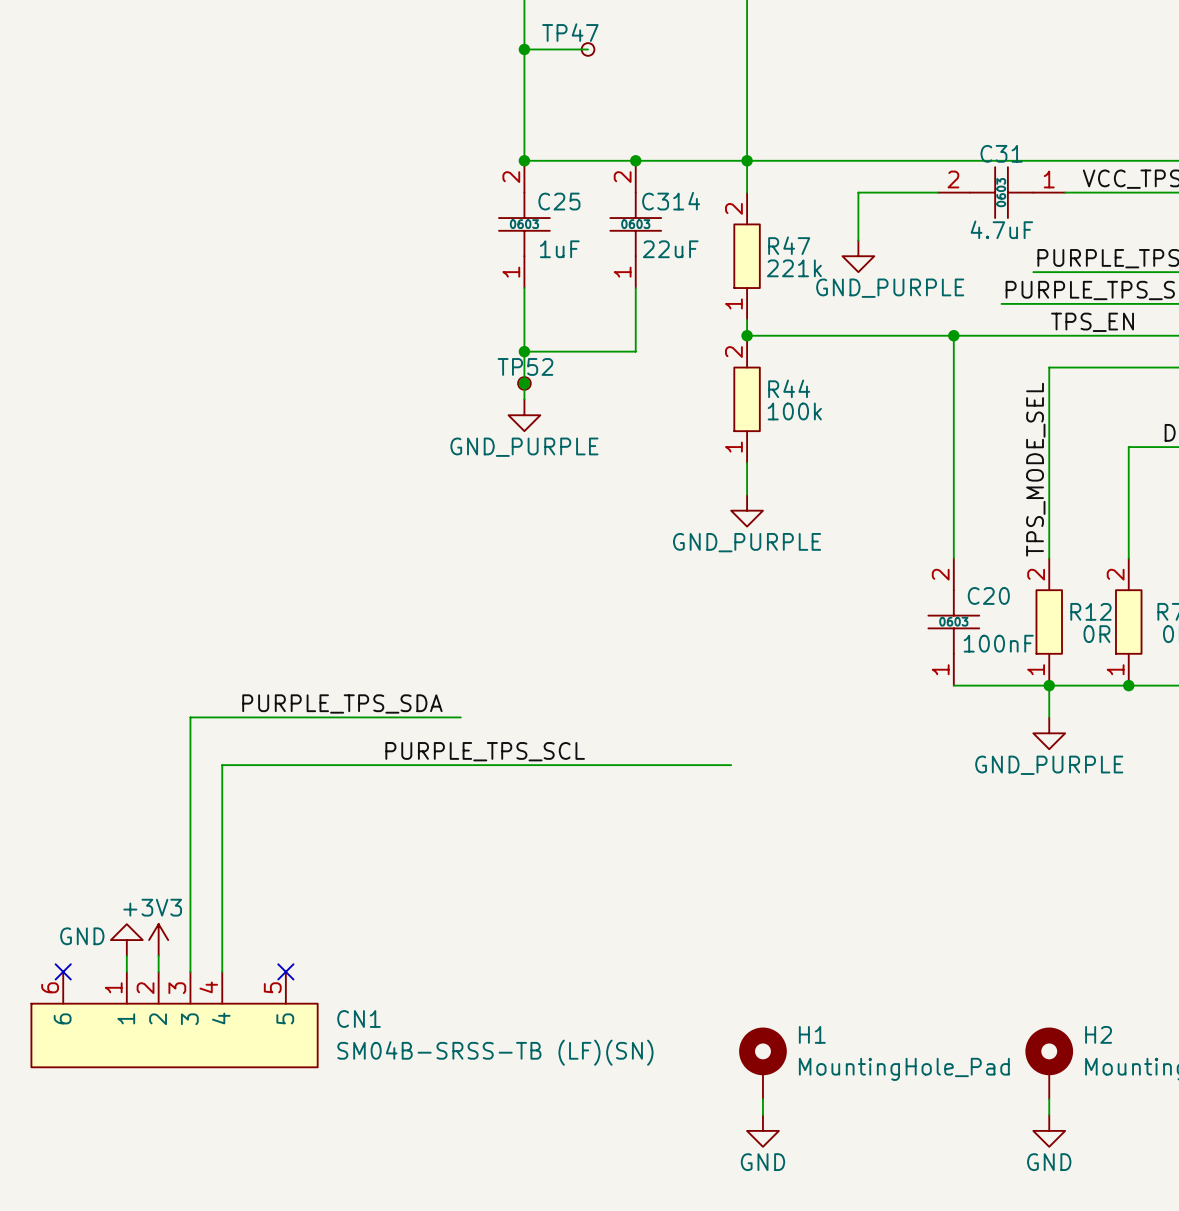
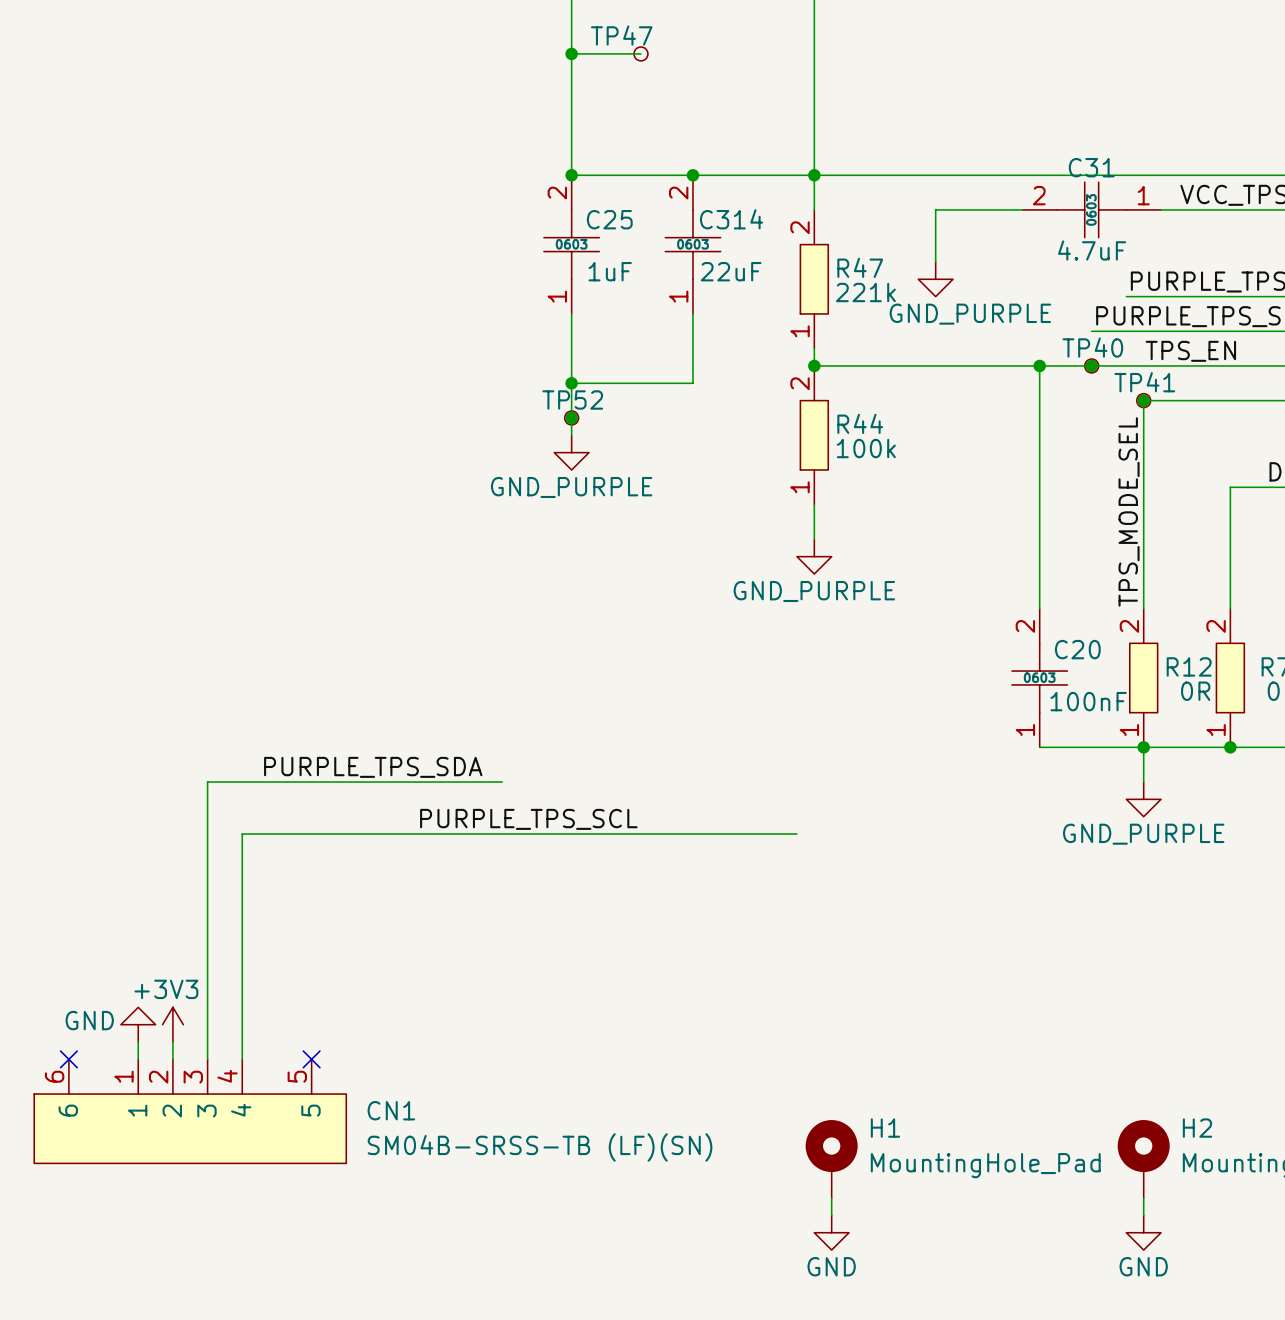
junction: none -> (1091, 365)
TP40: none -> (1091, 365)
junction: none -> (1143, 400)
TP41: none -> (1143, 400)

